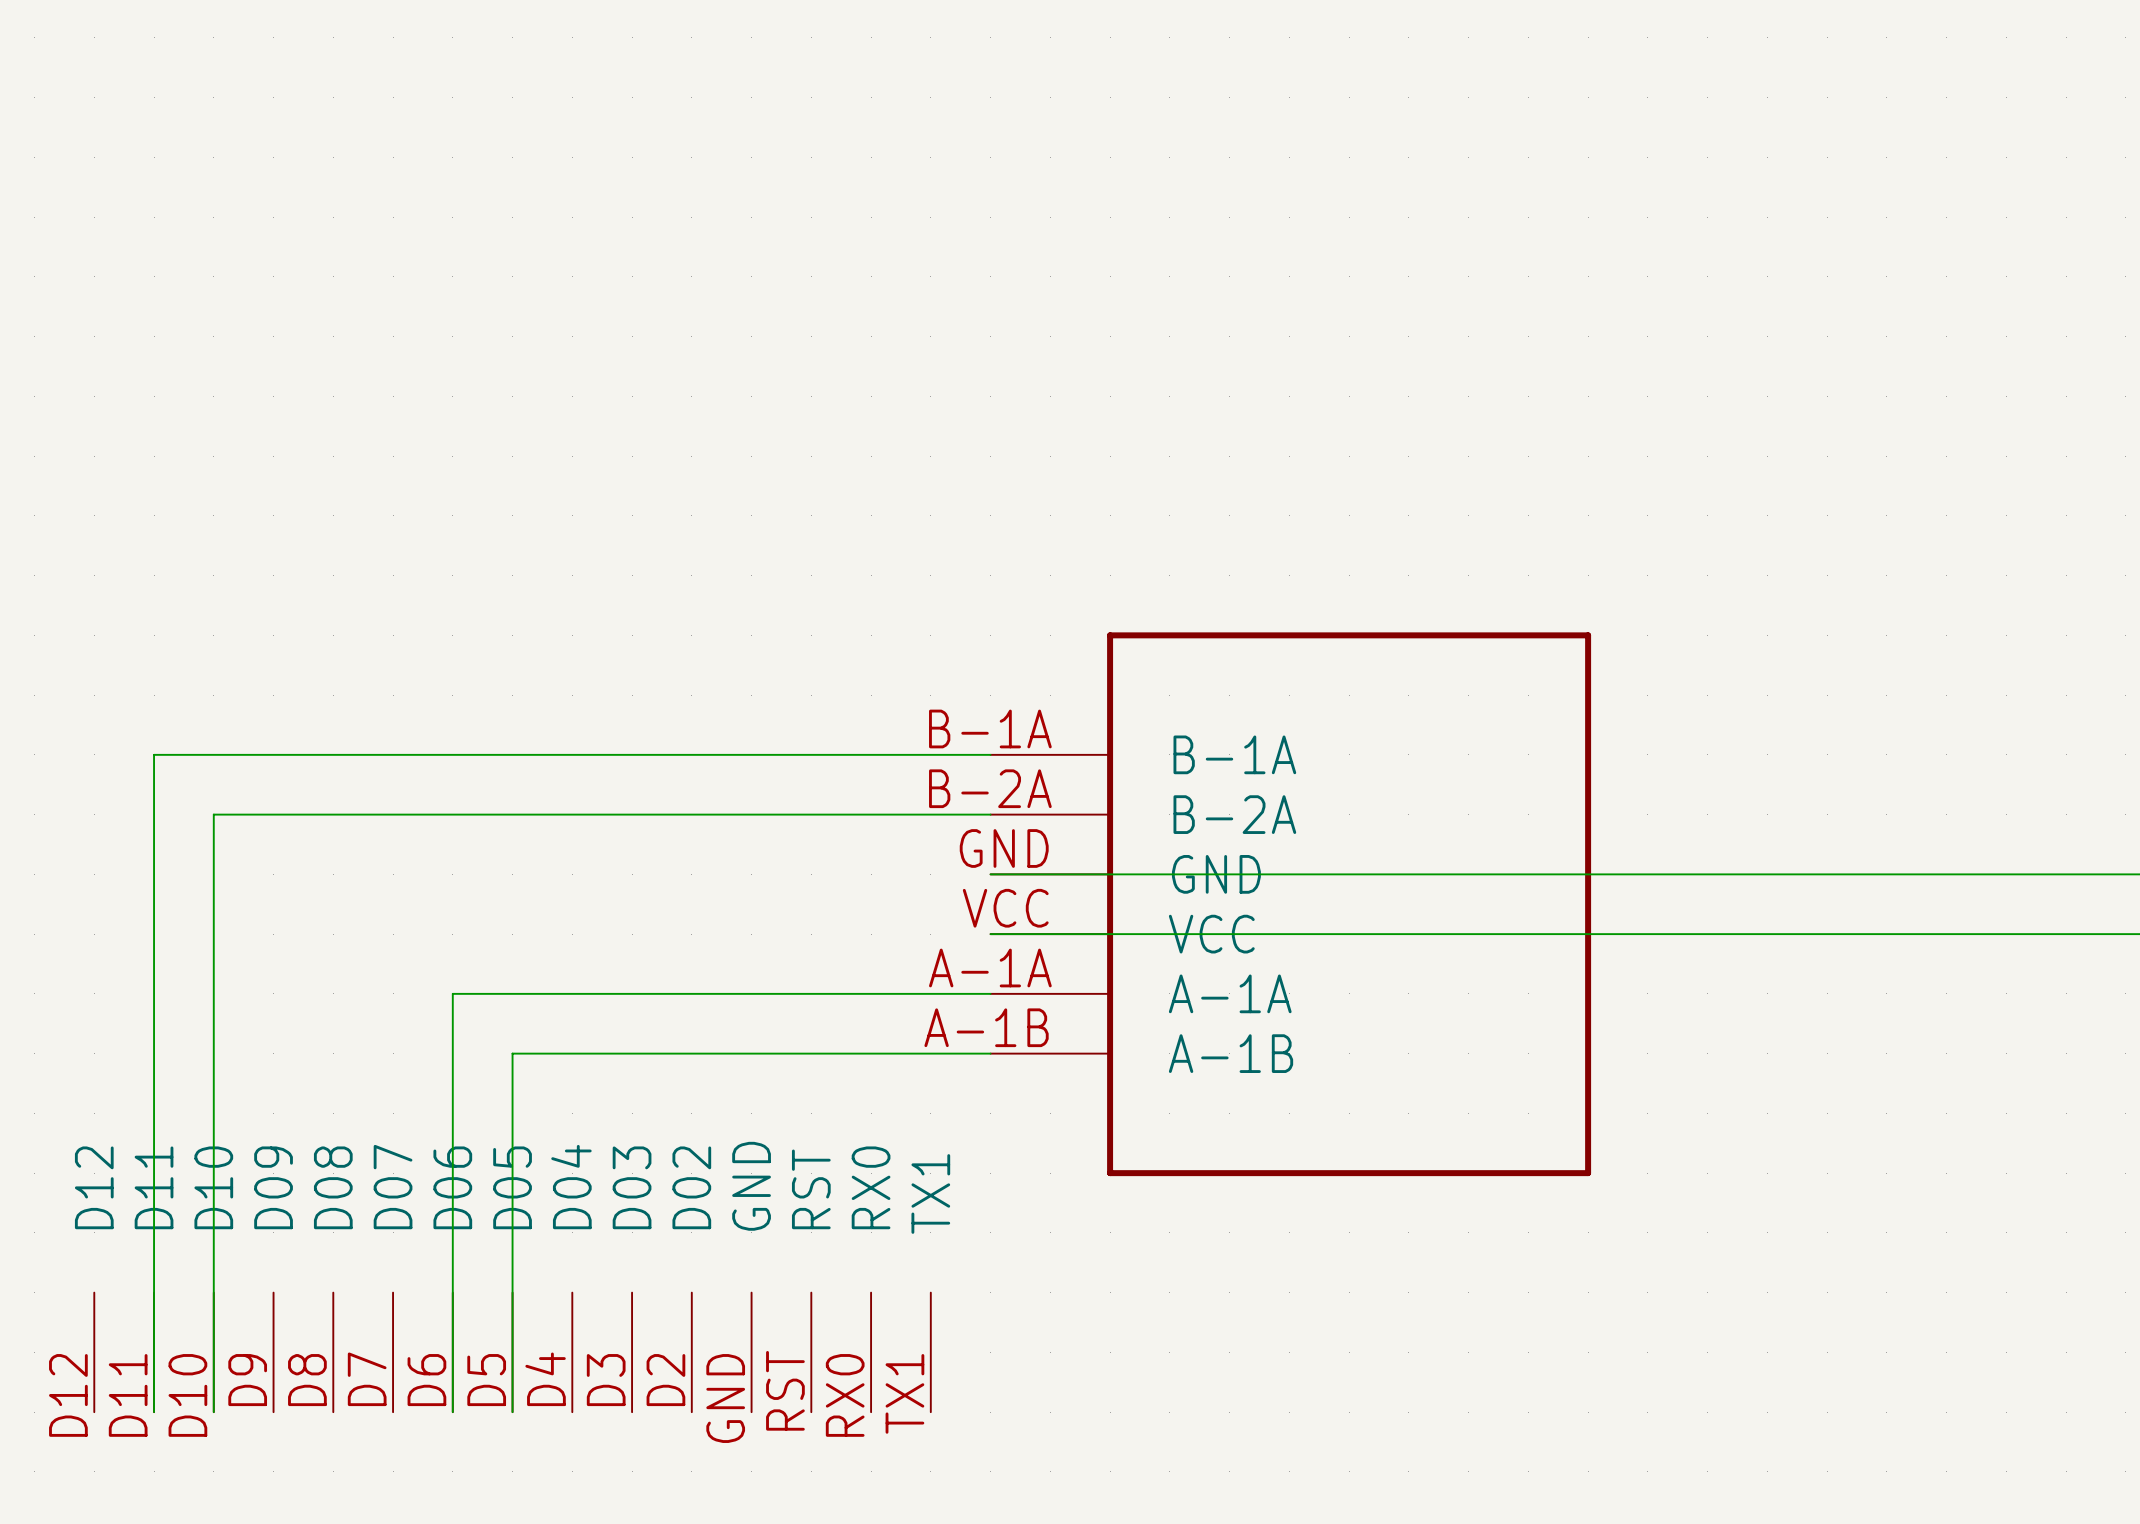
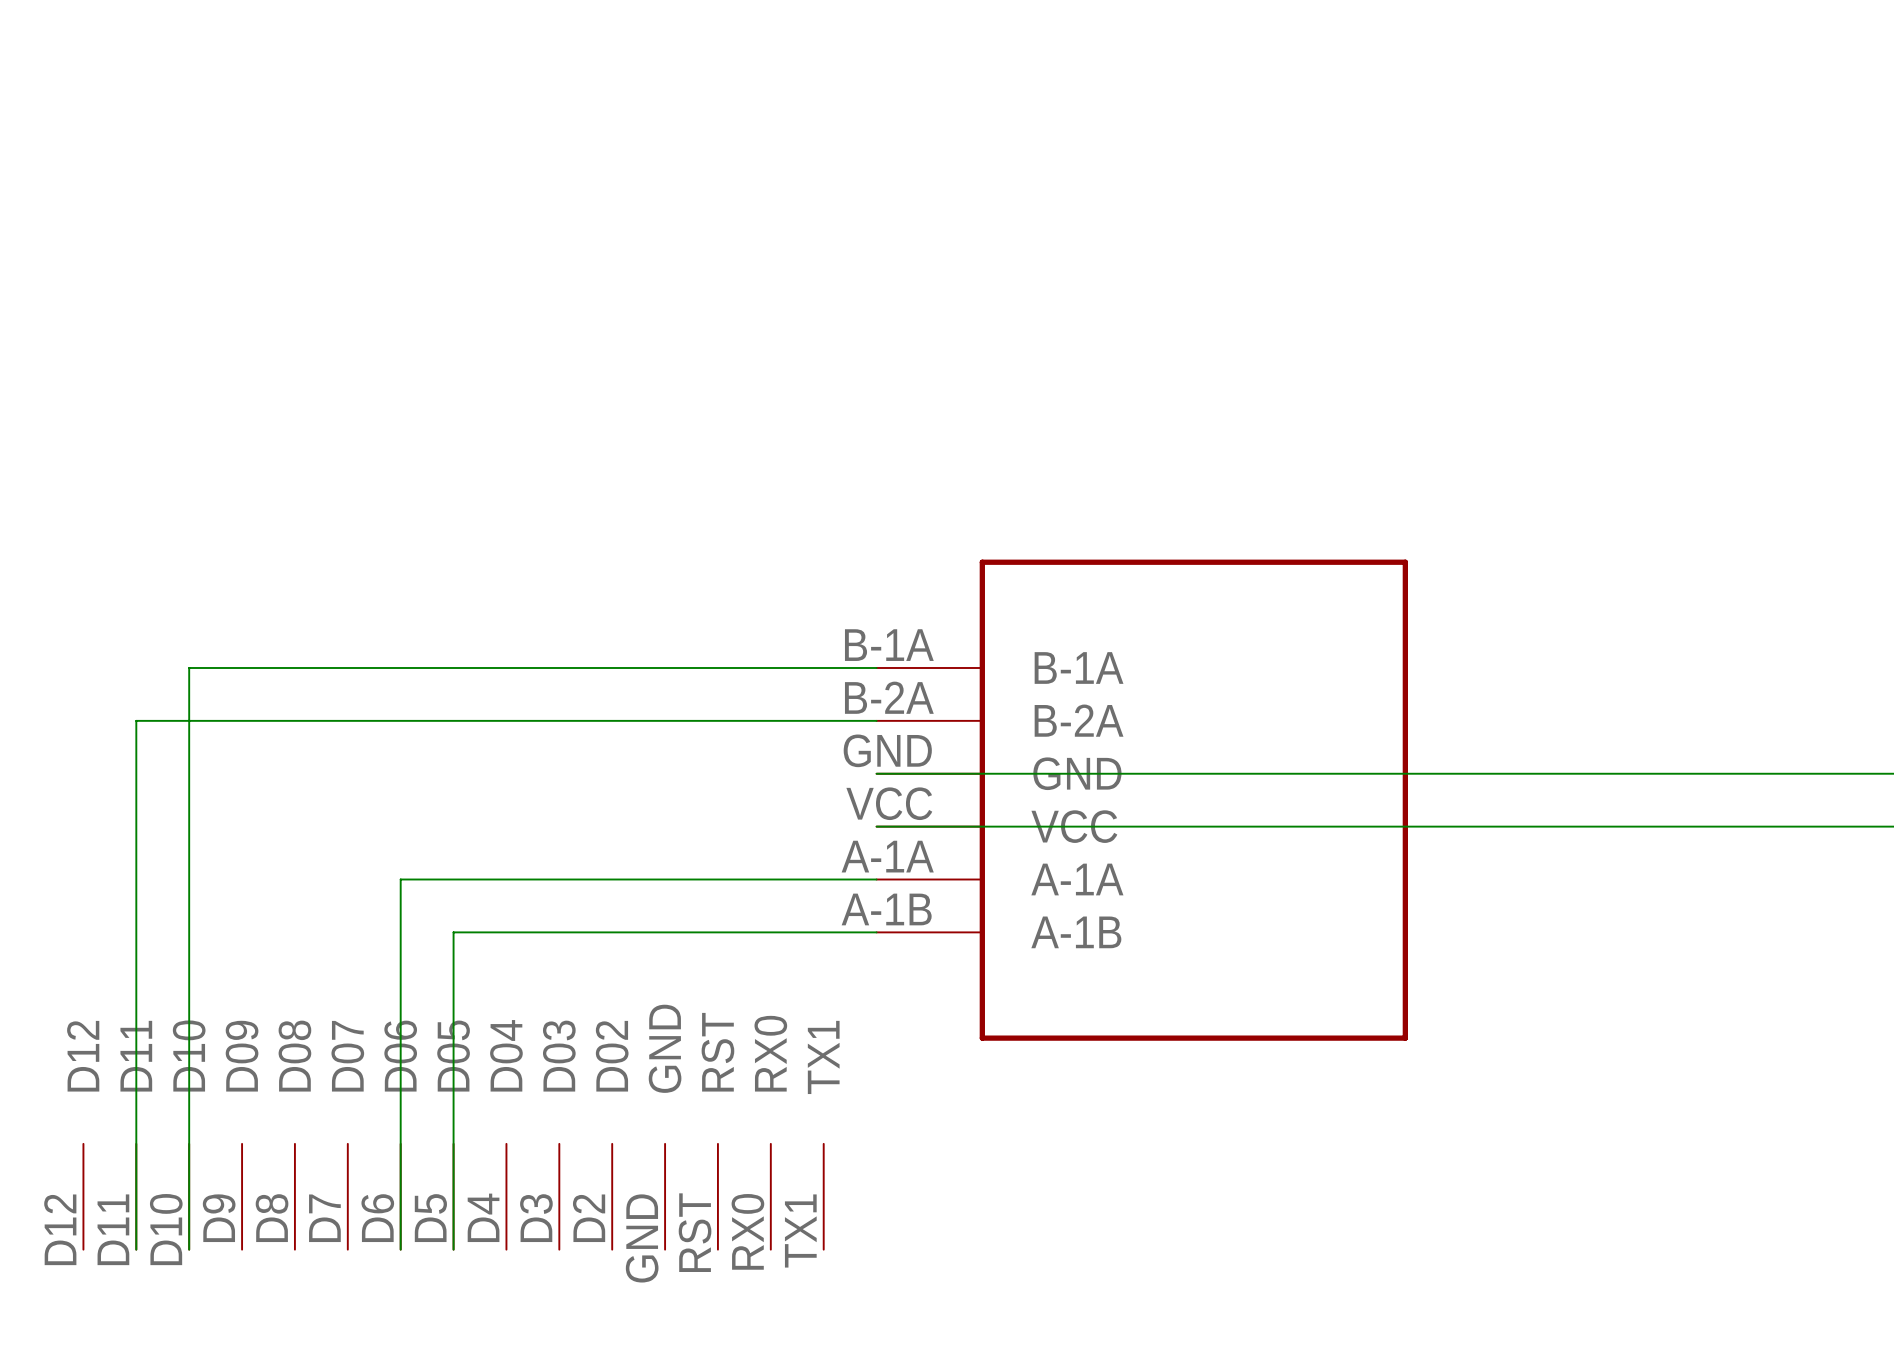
wire: (213, 754) (154, 754) (154, 814) -> (189, 667) (189, 720) (136, 720)

